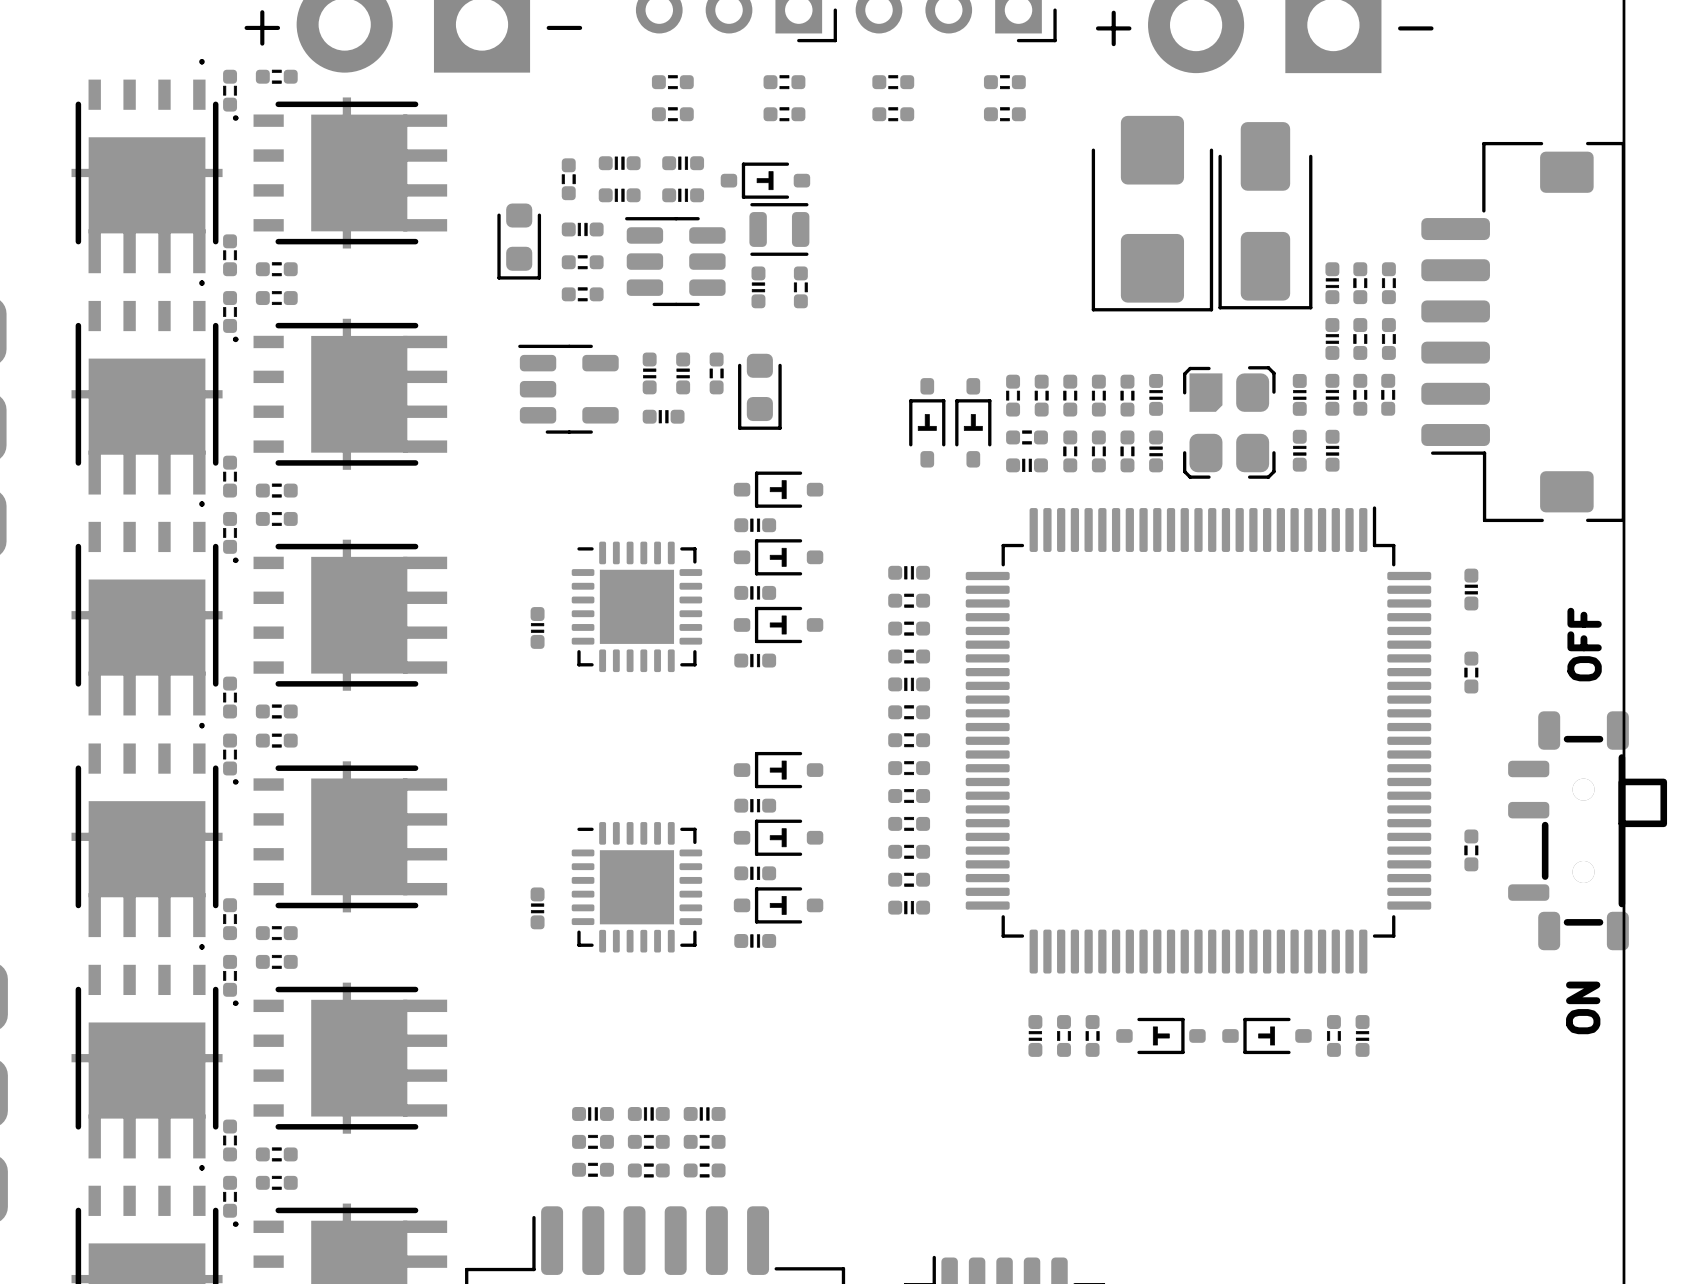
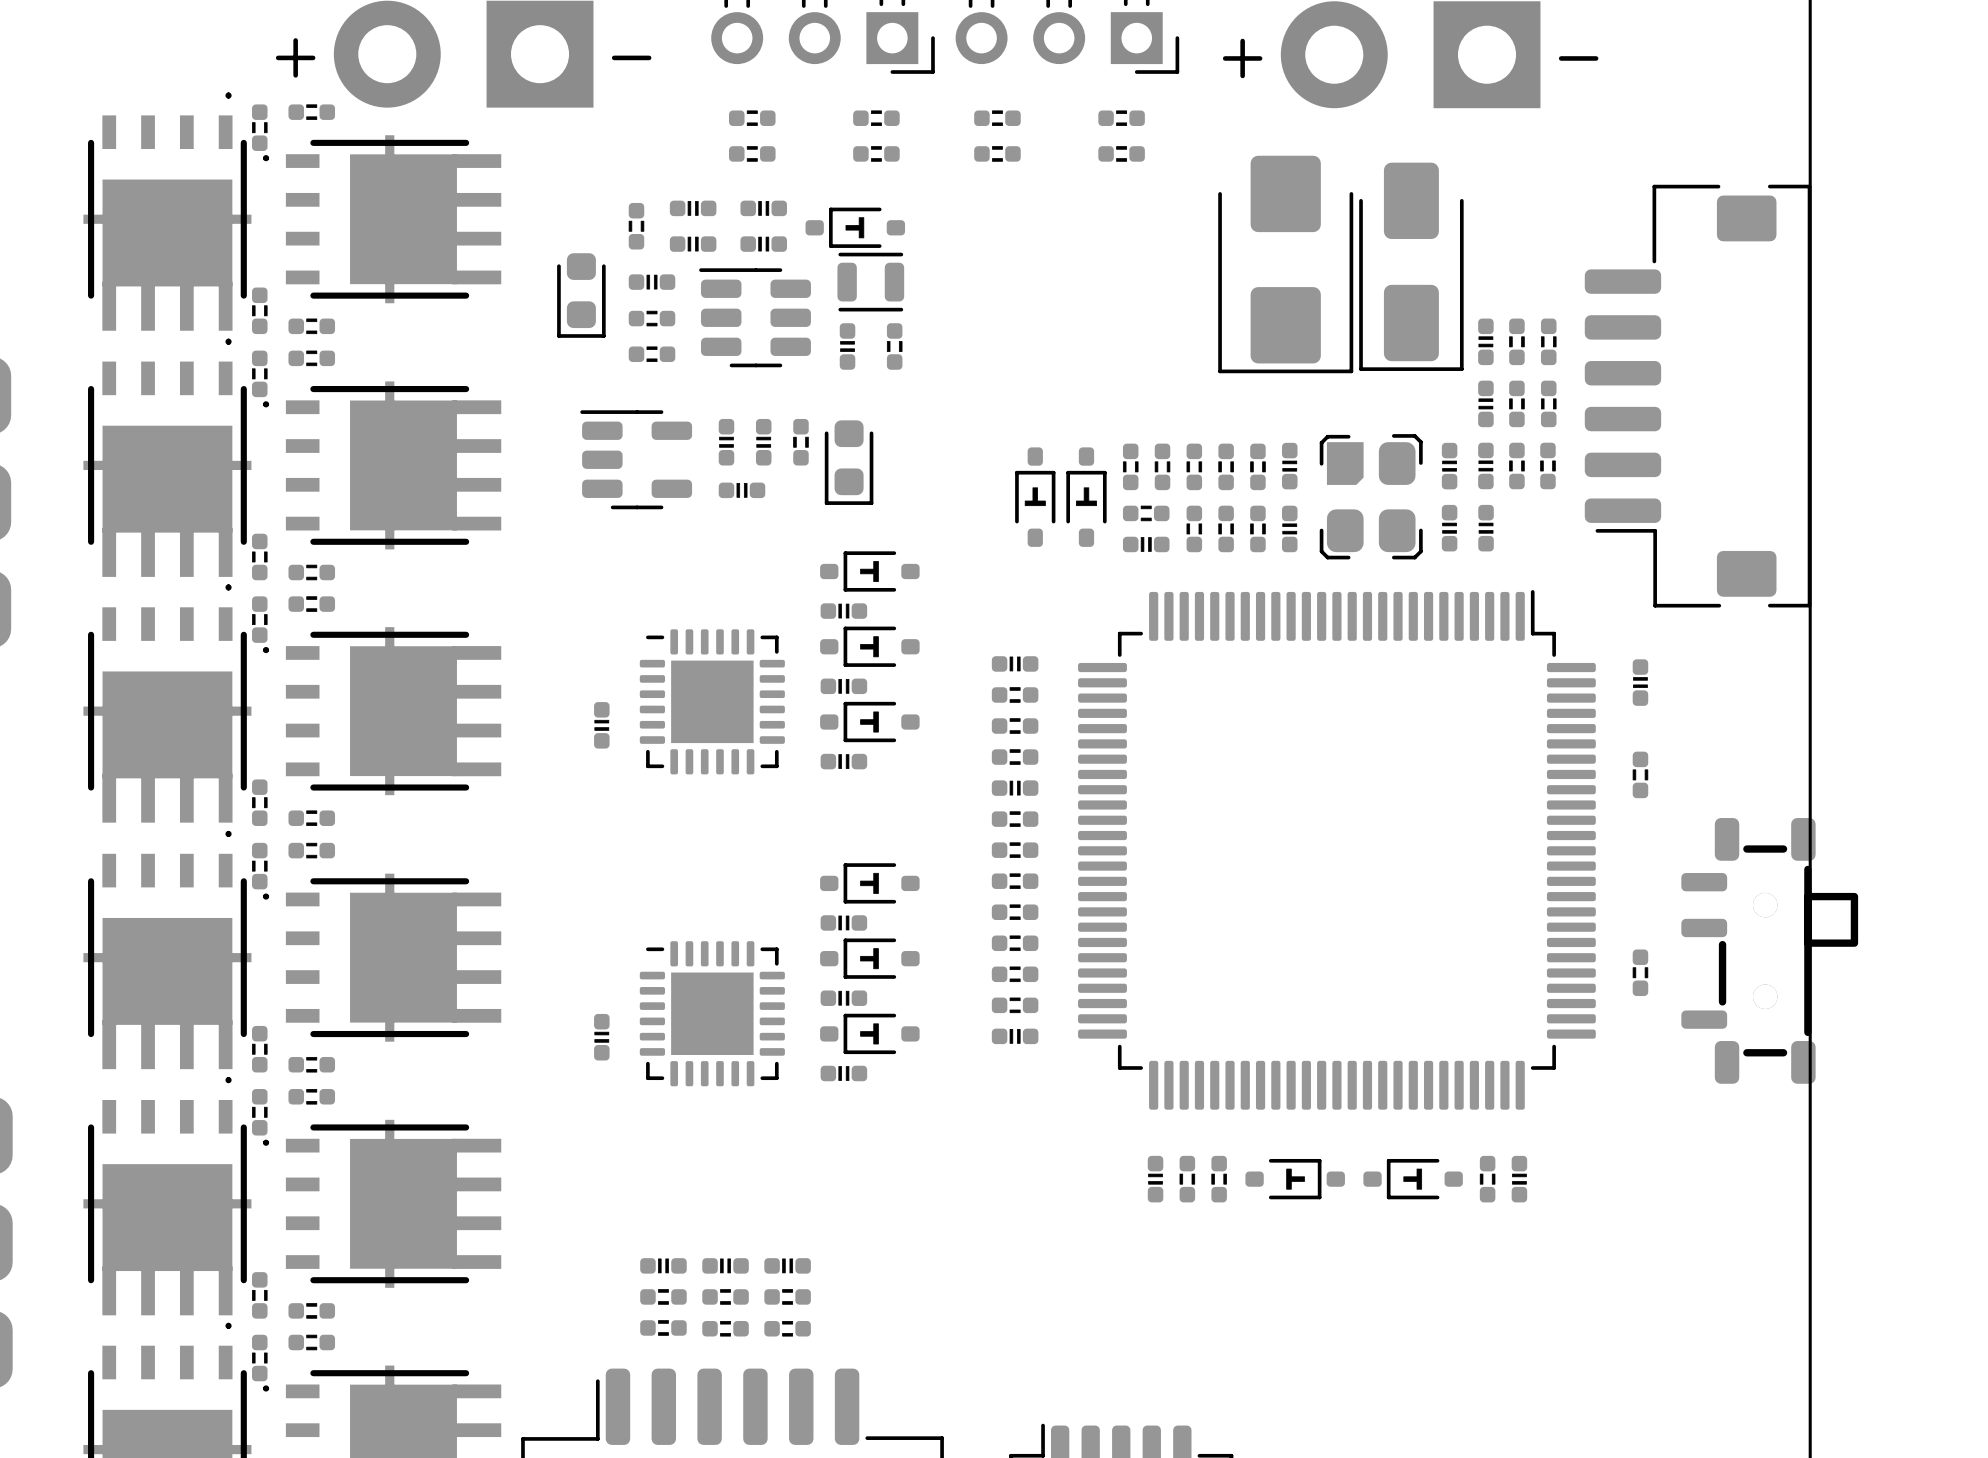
text: OFF (1584, 644) -> none
text: ON (1583, 1007) -> none

